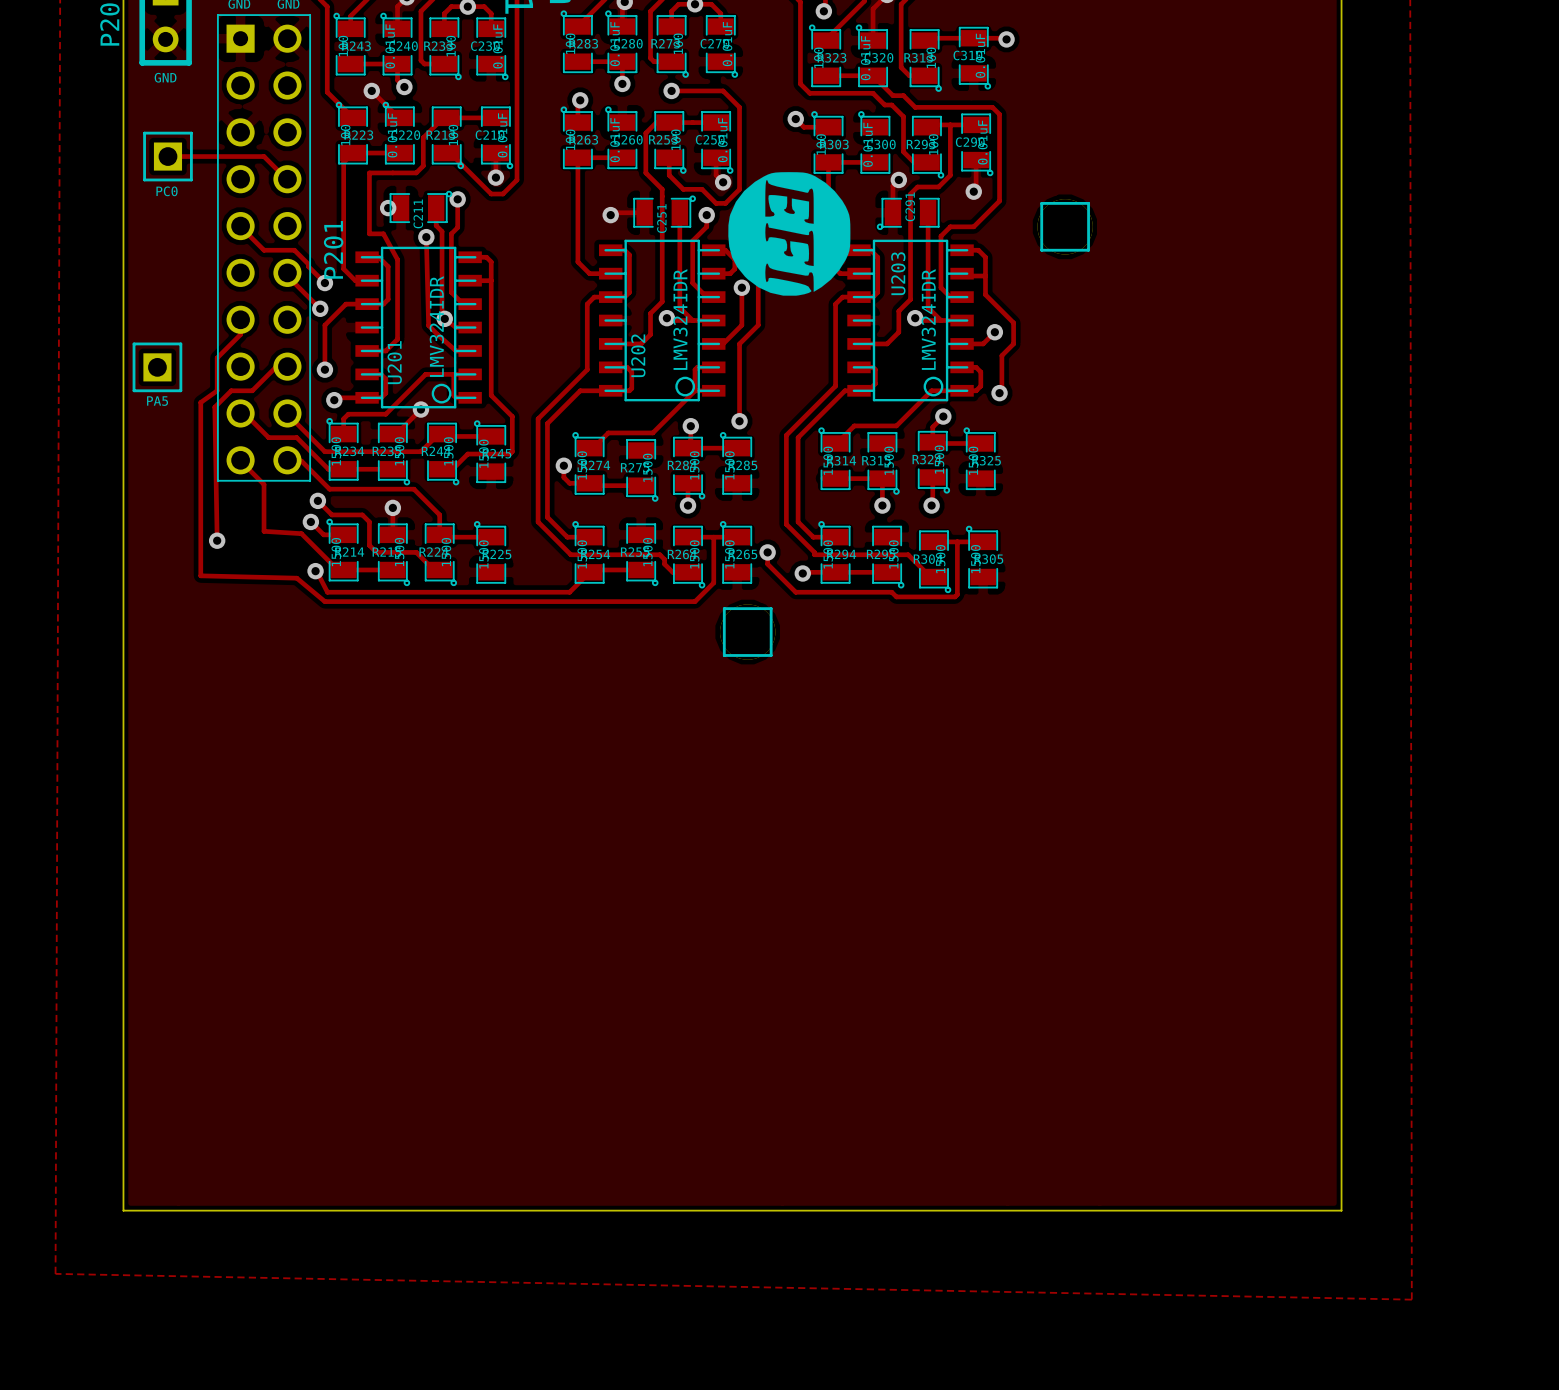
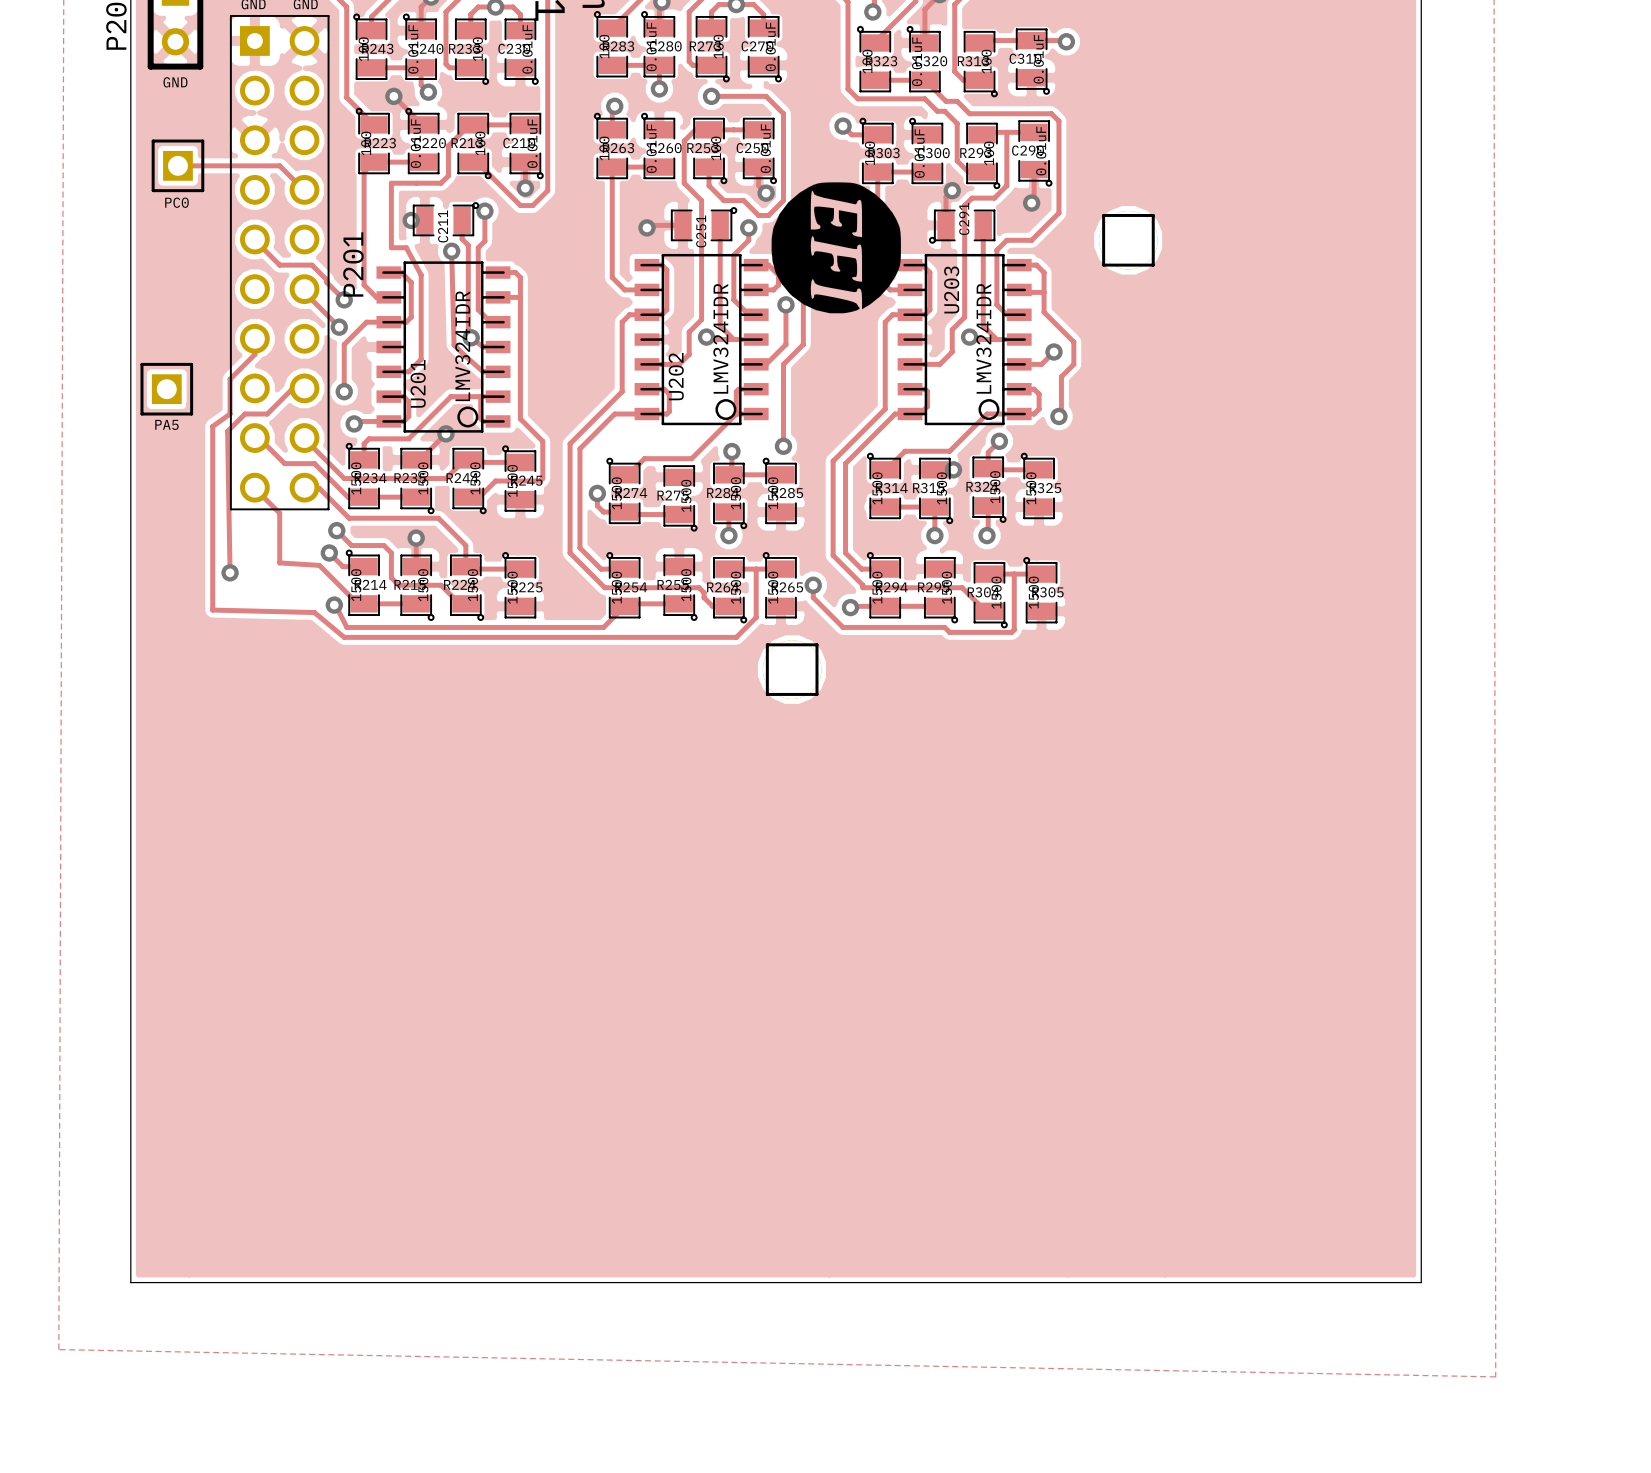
via: none -> (953, 469)

